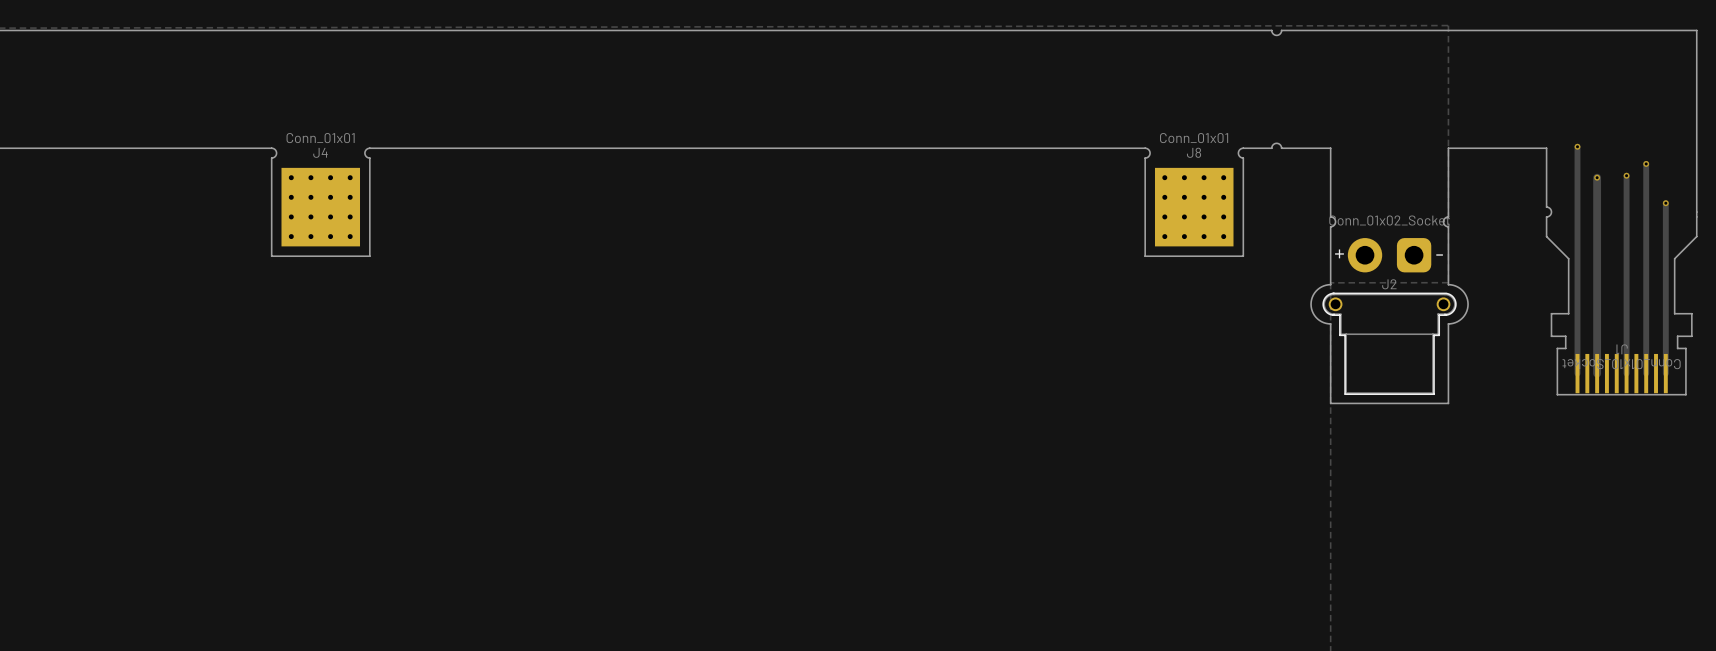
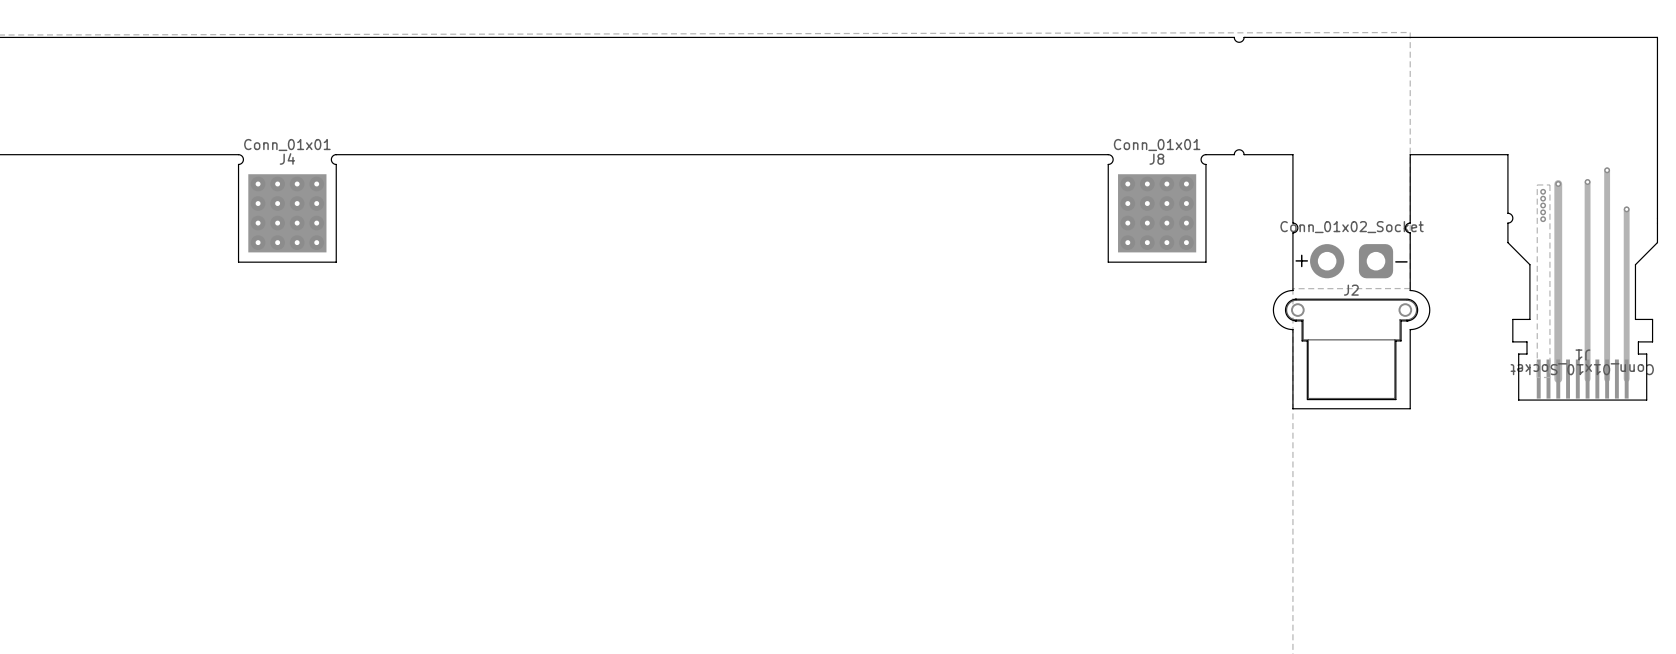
track: (1577, 146) (1577, 373) -> none
via: (1577, 146) -> none
zone outline: none -> (1537, 184) (1537, 377) (1549, 377) (1549, 184) (1537, 184)
via: none -> (1543, 191)
via: none -> (1543, 198)
via: none -> (1543, 205)
via: none -> (1543, 212)
via: none -> (1543, 219)

